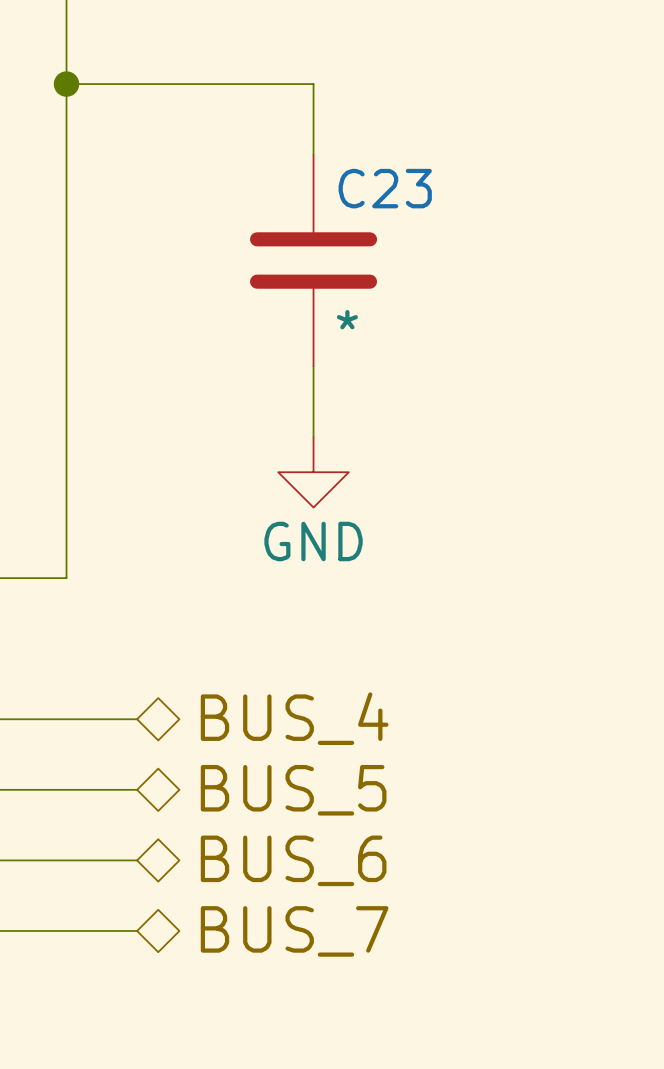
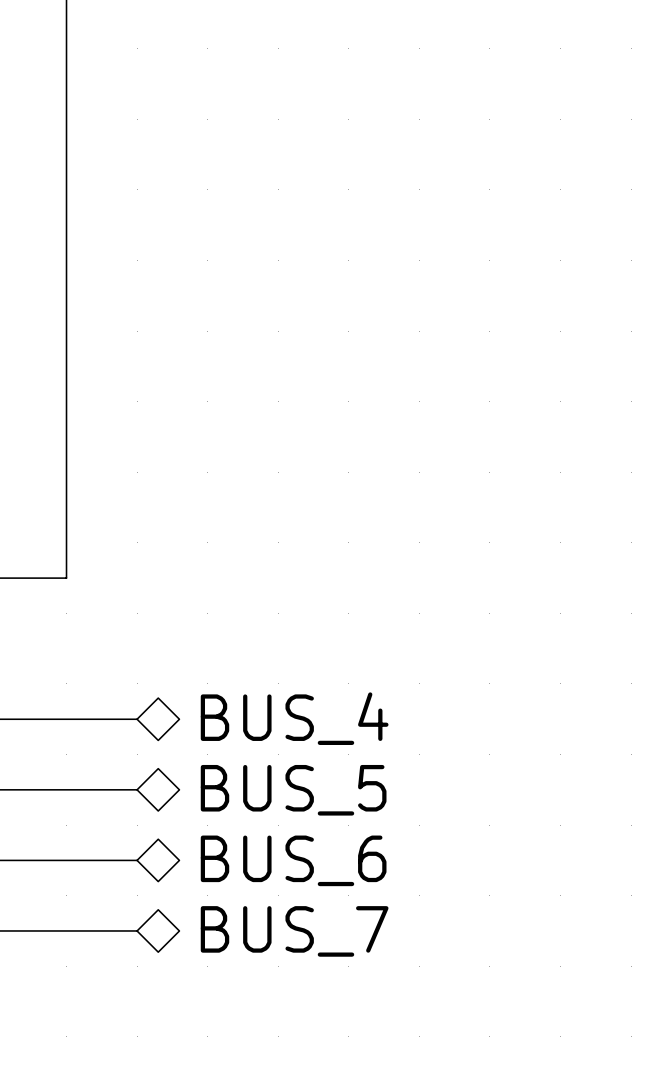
wire: (66, 84) (313, 84) (313, 154) -> none
junction: (66, 84) -> none
C23: * (313, 260) -> none
wire: (313, 366) (313, 436) -> none
power symbol: GND (313, 472) -> none

